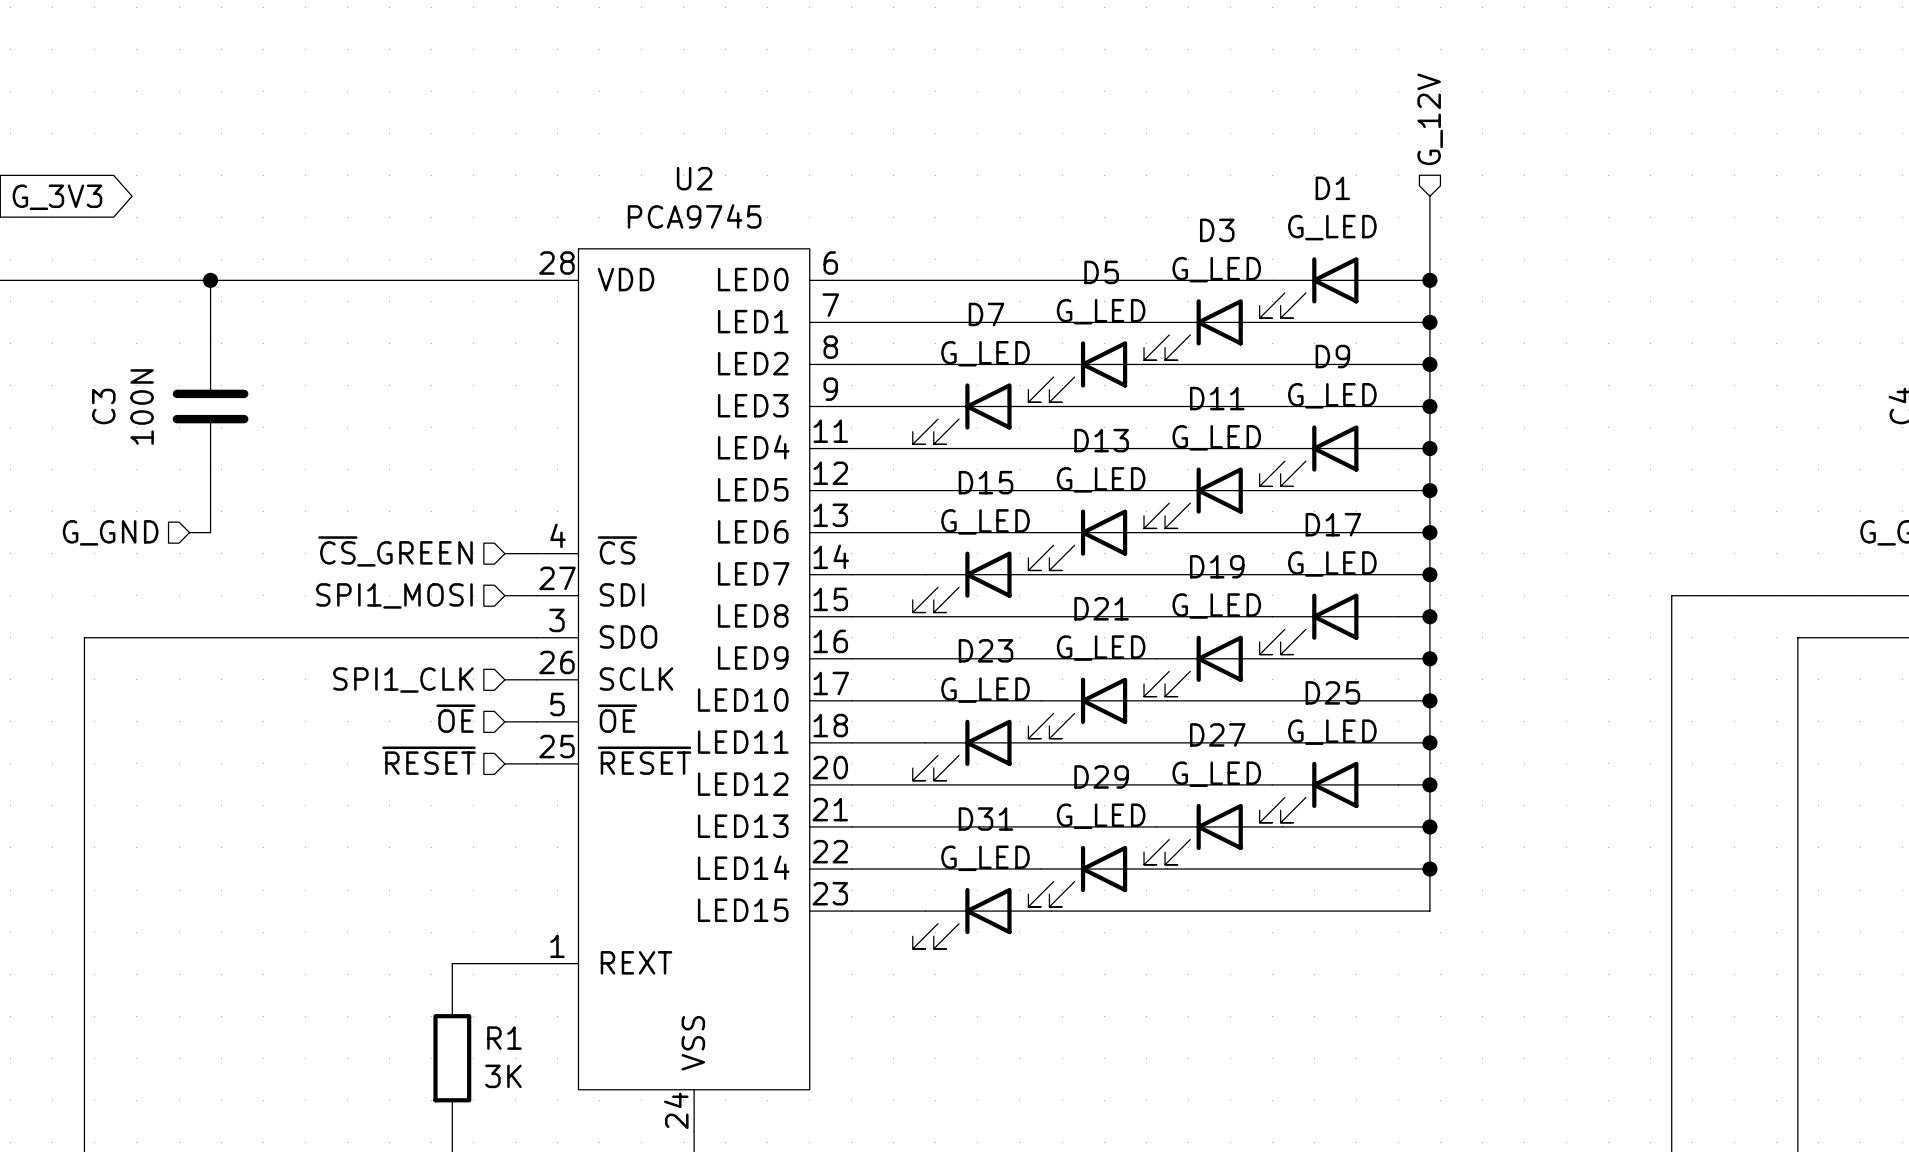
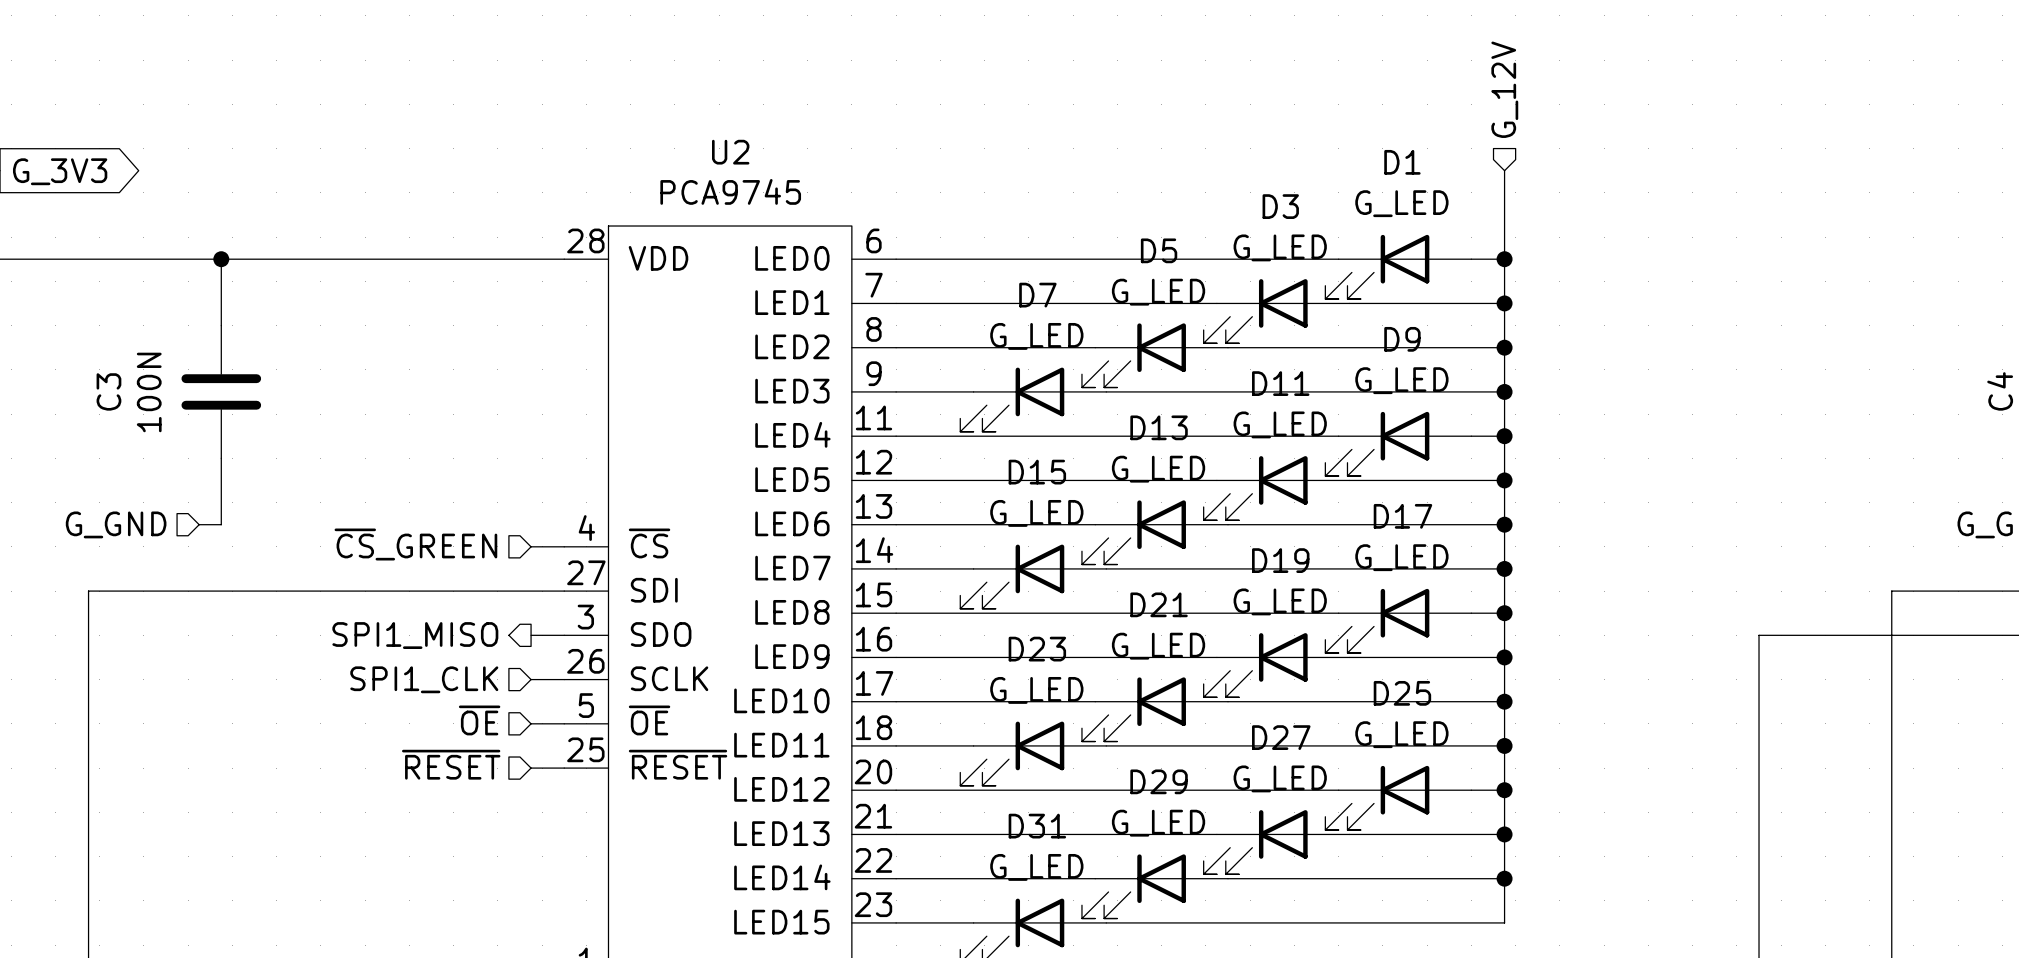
hierarchical label shape: input (394, 595) -> output (415, 635)
hierarchical label: SPI1_MOSI (394, 595) -> SPI1_MISO (415, 635)
wire: (1797, 595) (1671, 595) (1671, 637) -> (1891, 591) (1891, 635) (1759, 635)
wire: (84, 637) (504, 637) -> (88, 635) (88, 591) (531, 591)

